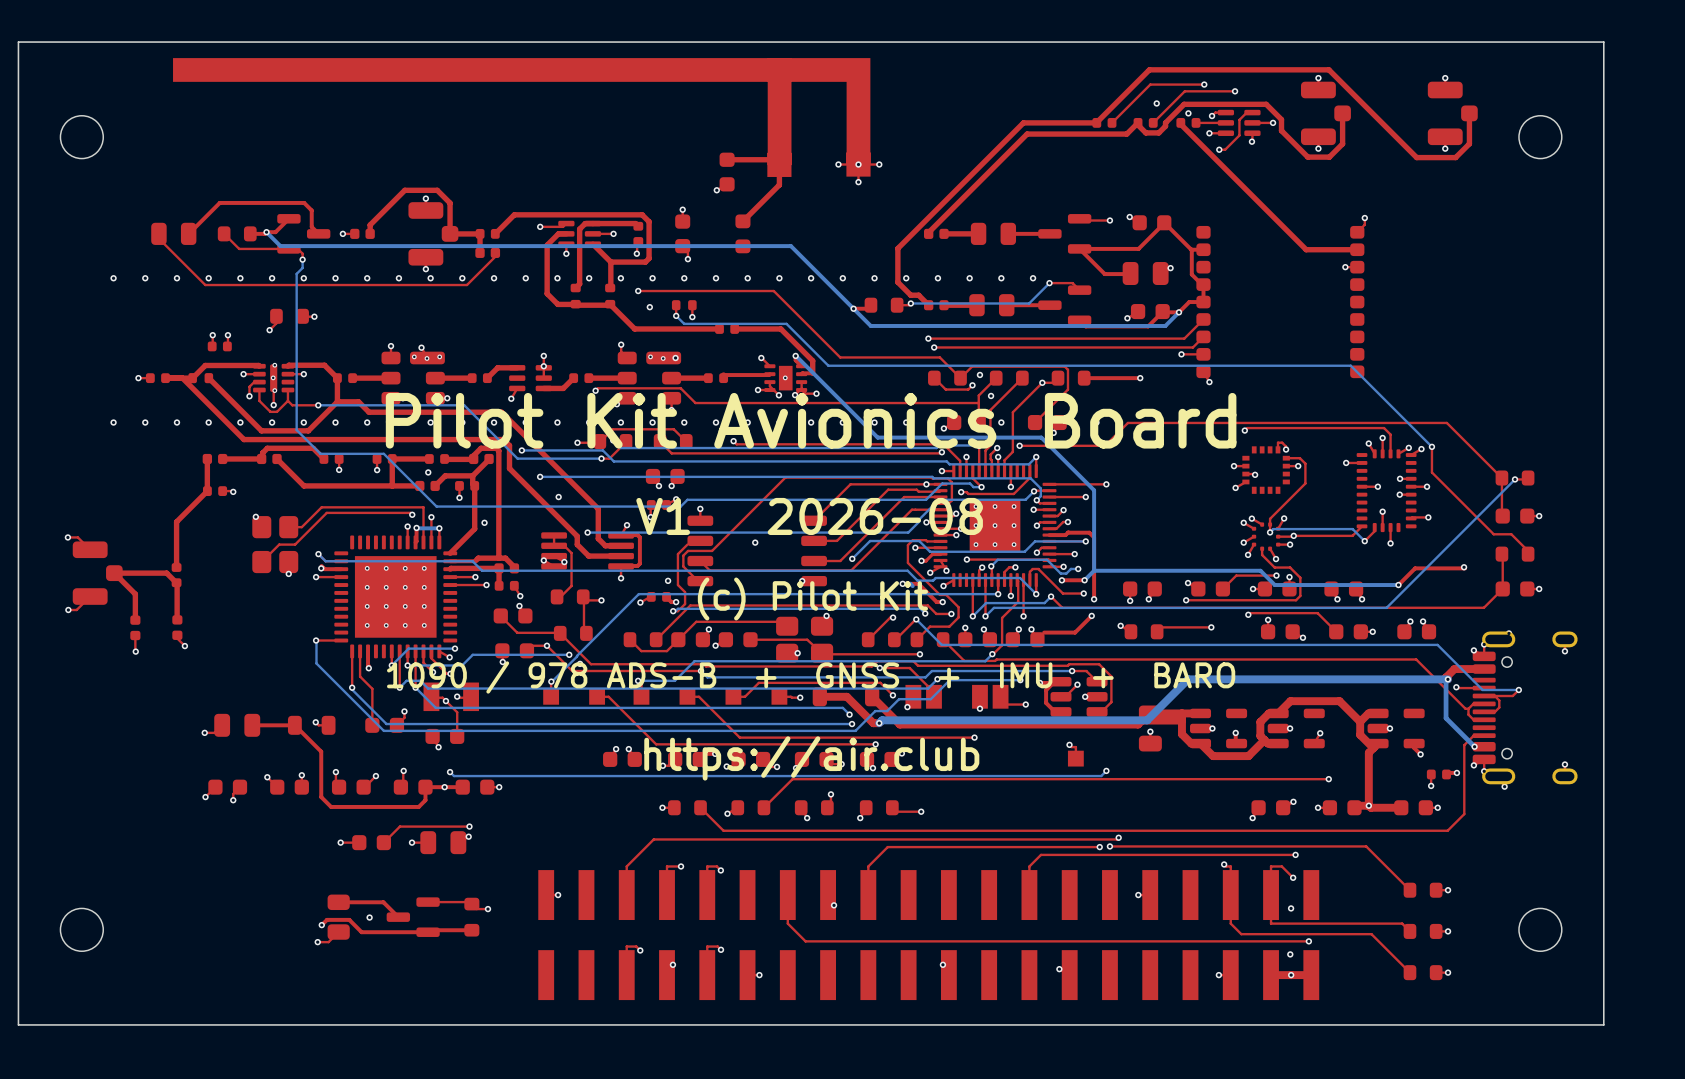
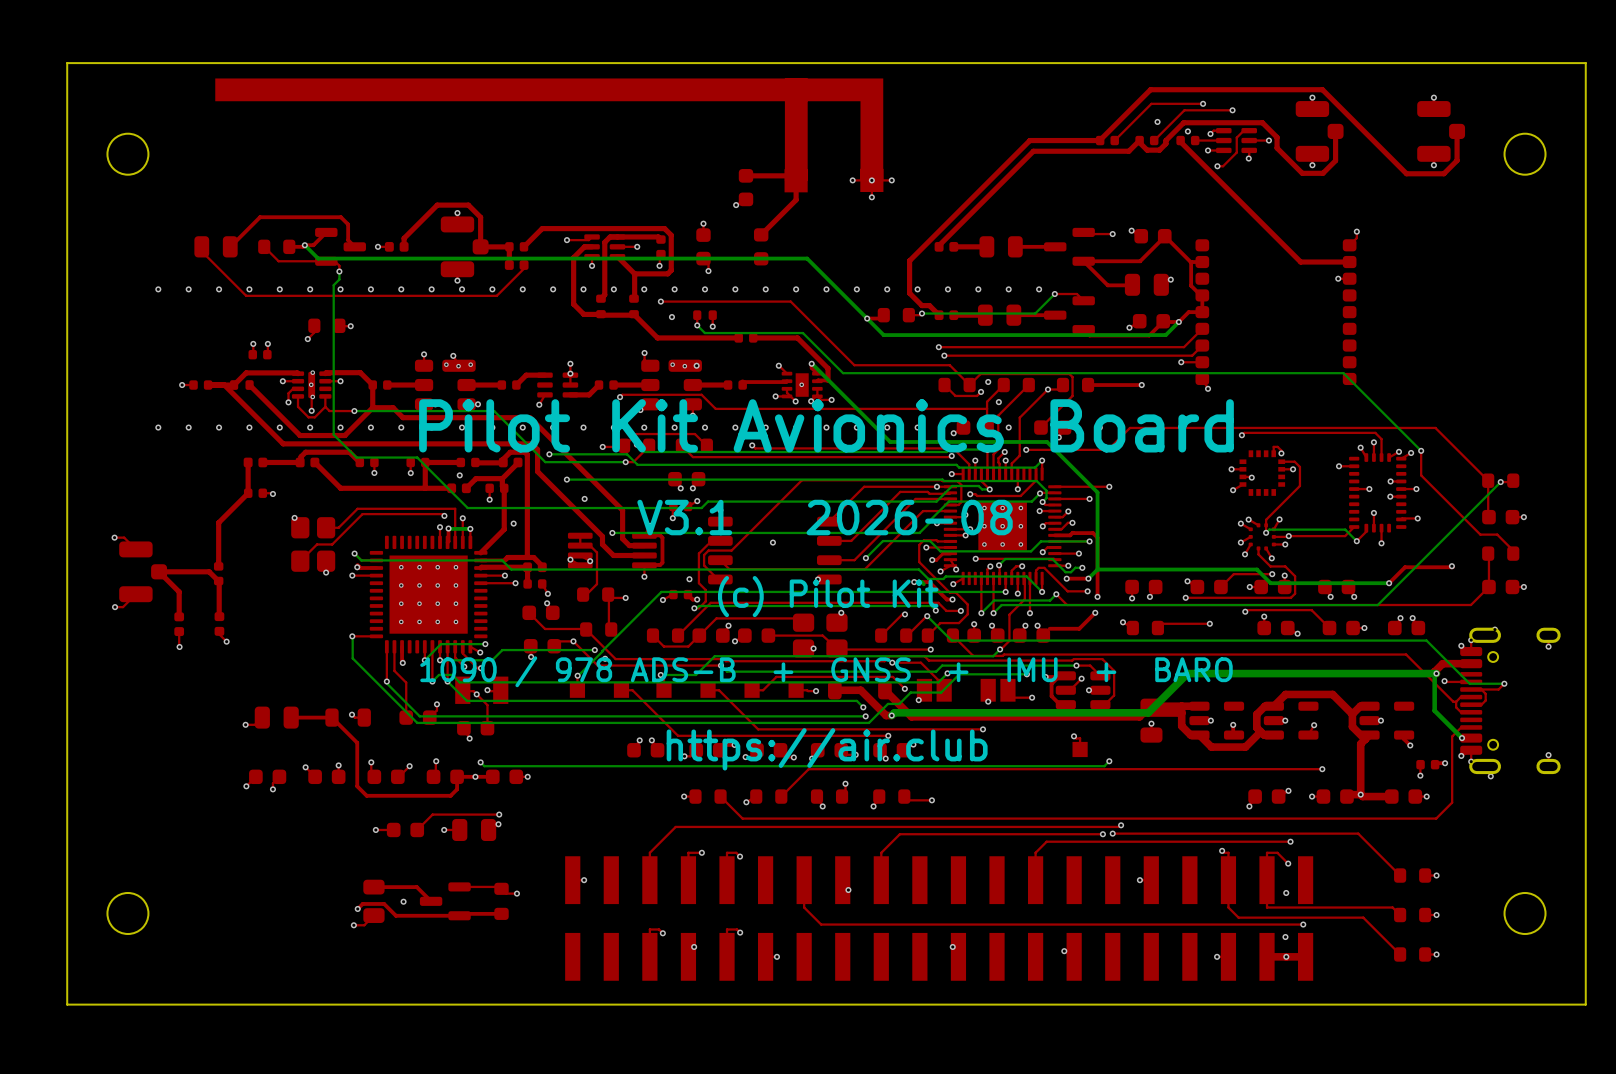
text: V1 2026-08 (809, 516) -> V3.1 2026-08 (825, 517)

